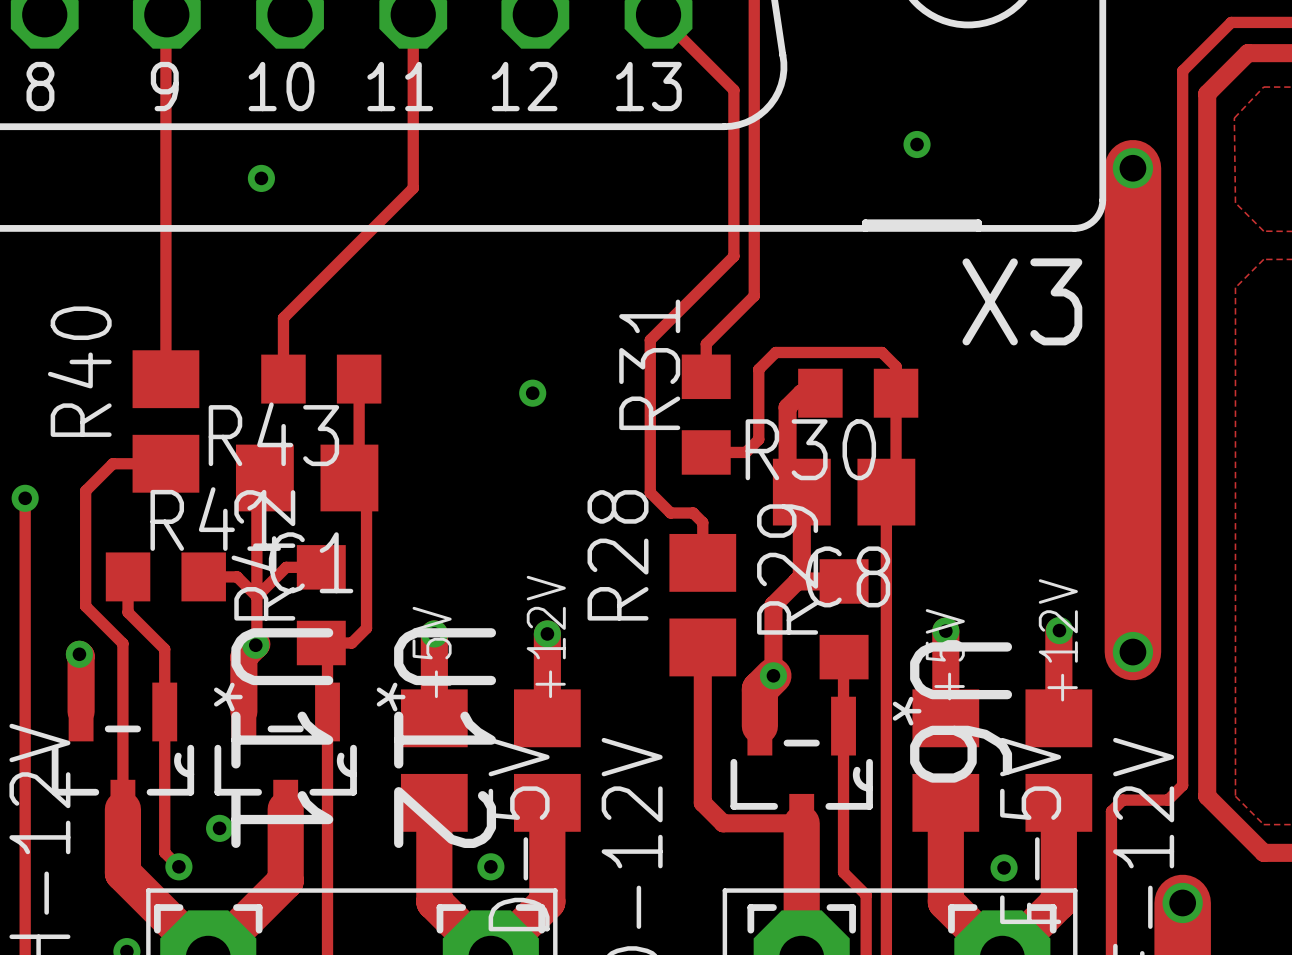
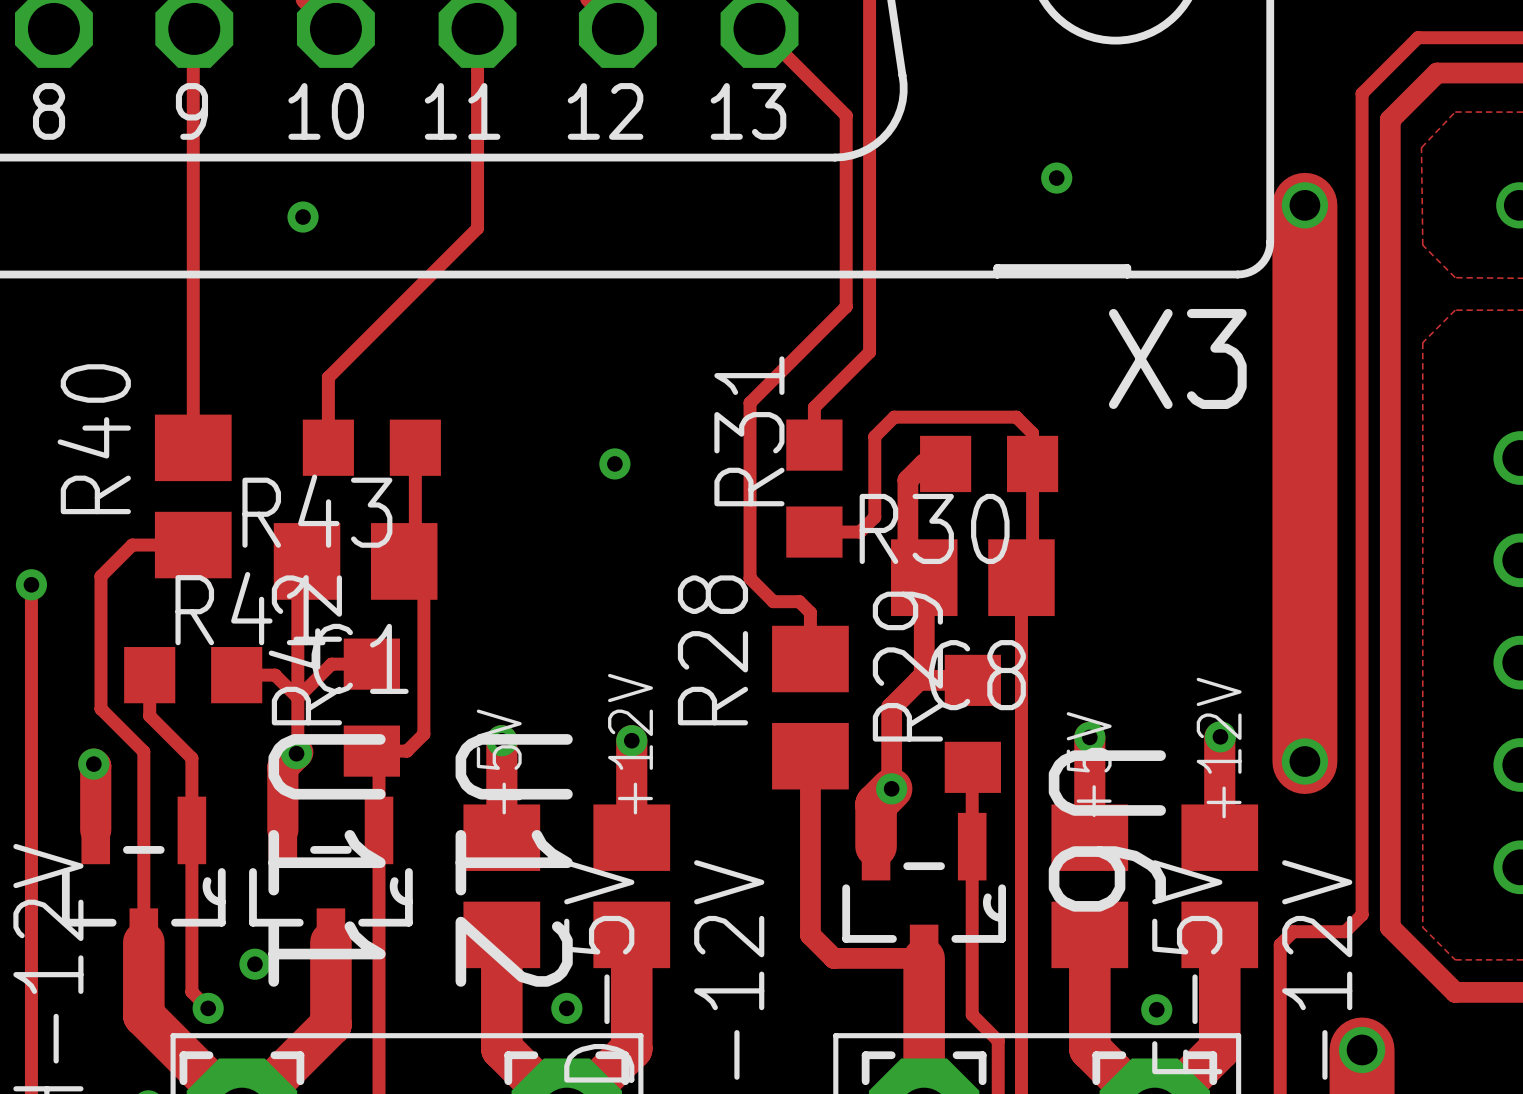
U11 text: * (228, 697) -> none
U12 text: * (391, 697) -> none
U6 text: * (907, 711) -> none

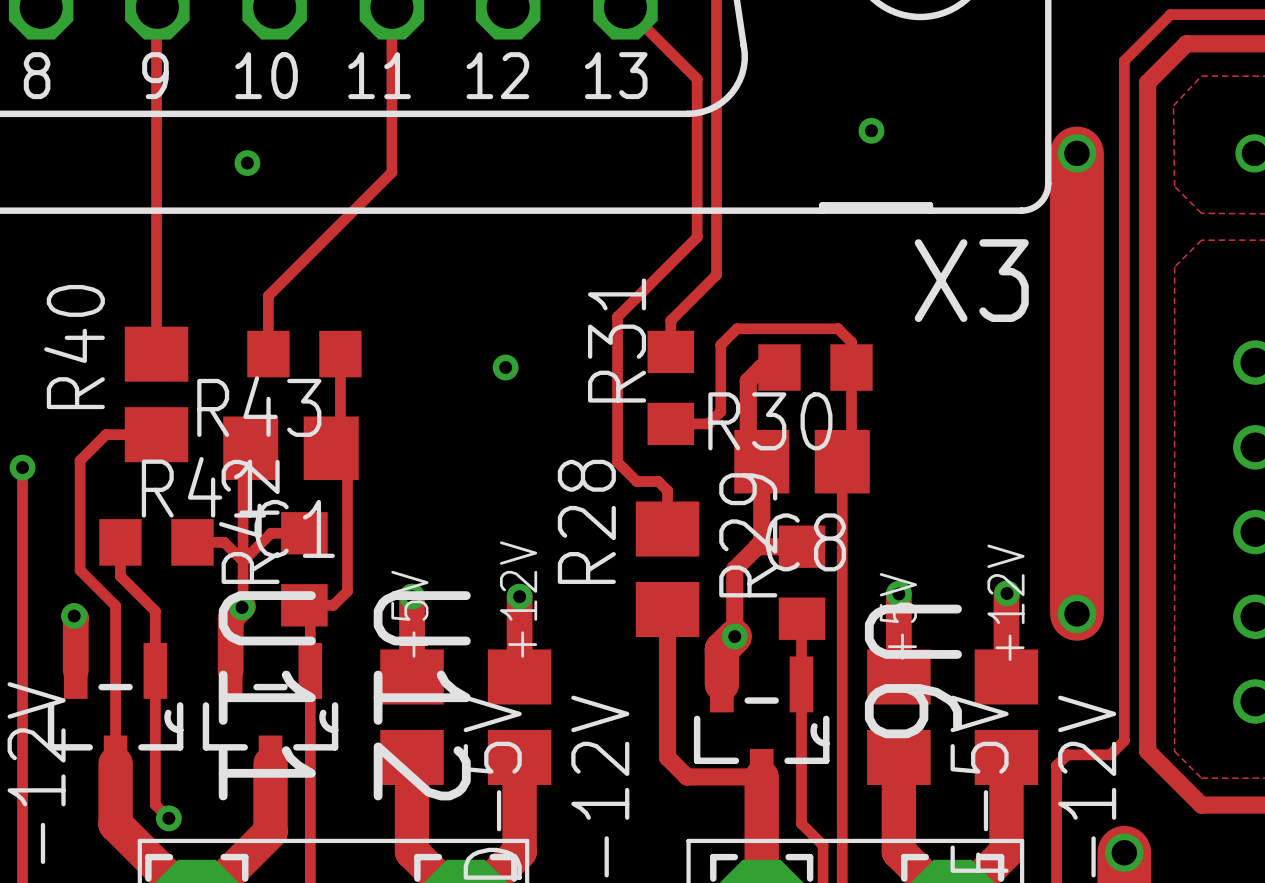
via: (254, 964) -> none
via: (566, 1008) -> none
via: (1156, 1009) -> none

